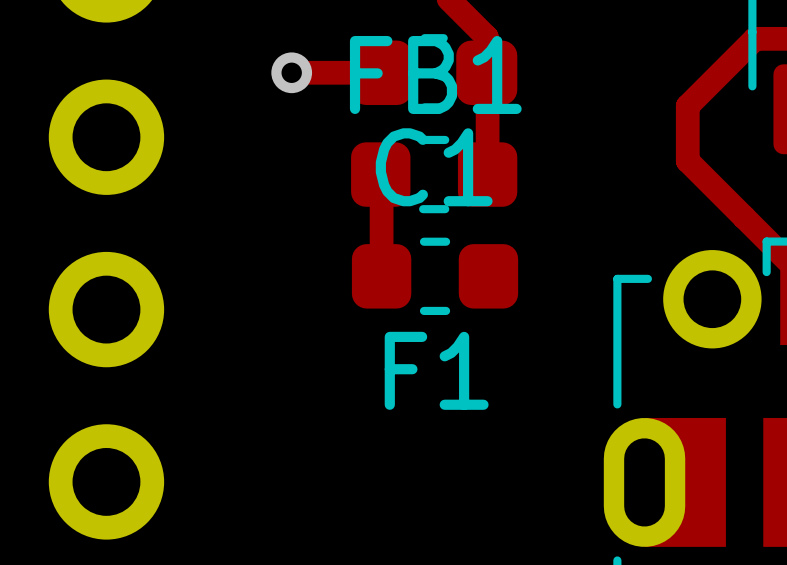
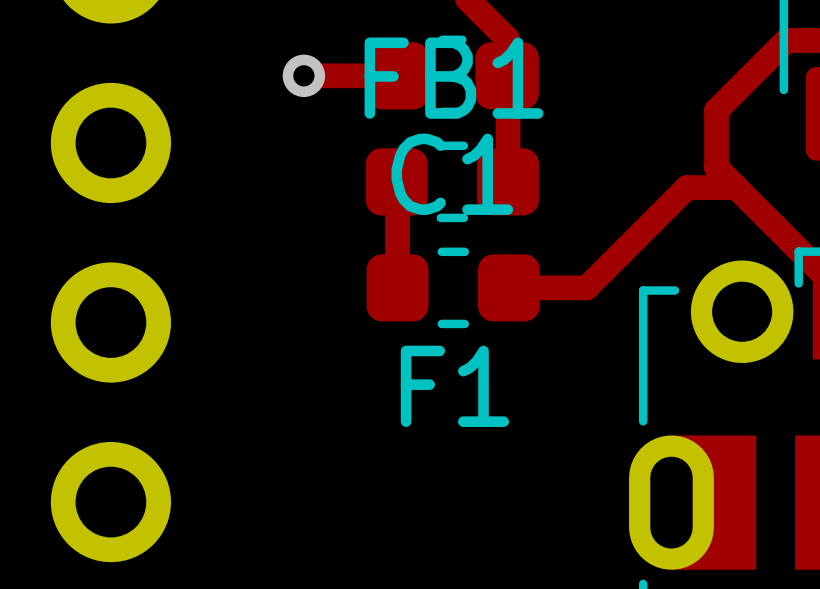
track: none -> (736, 187) (686, 187) (586, 287) (508, 287)

